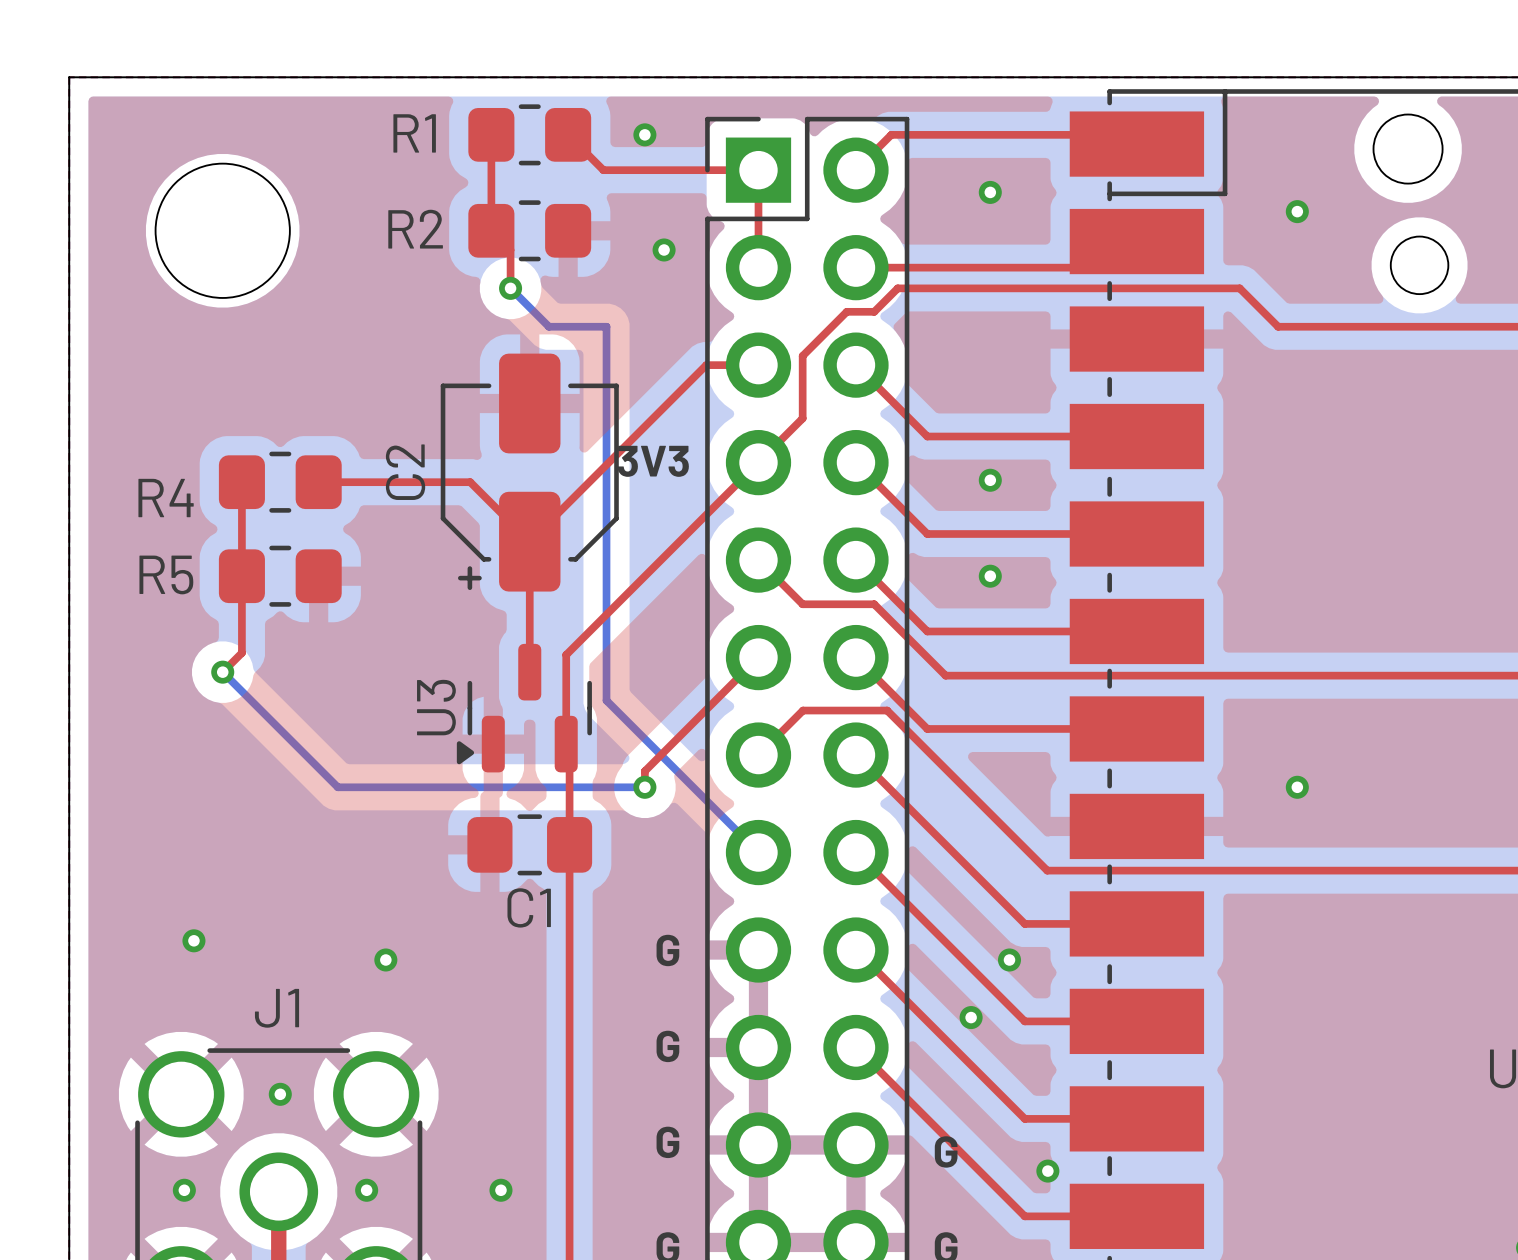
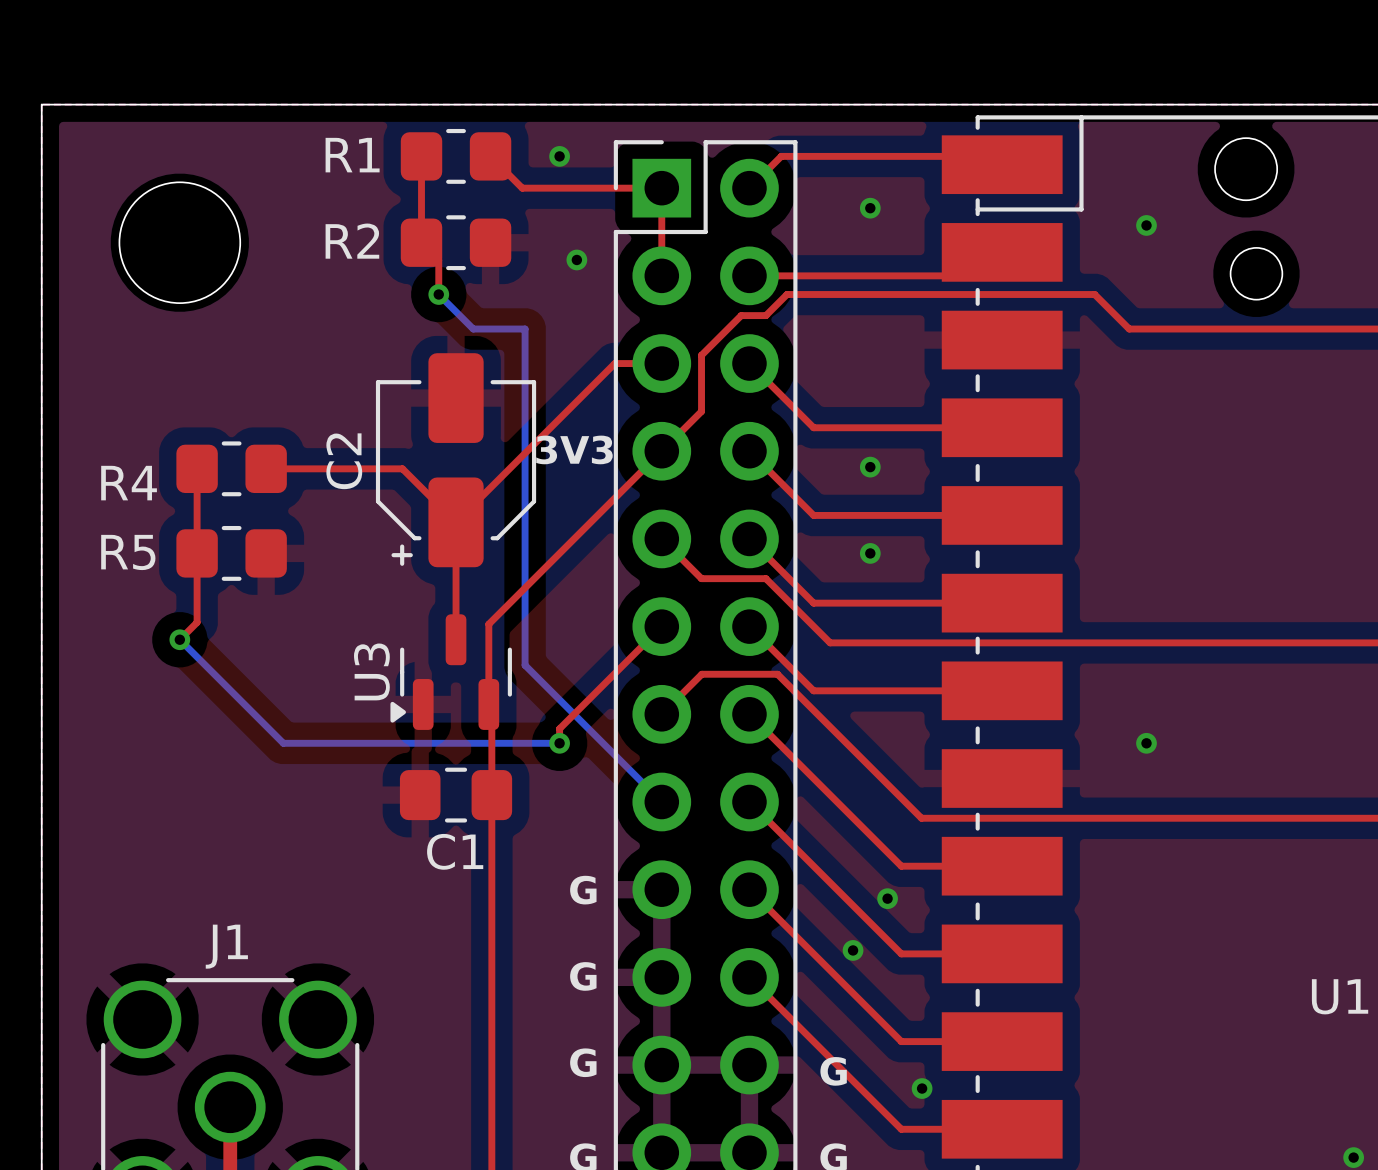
via: (193, 940) -> none
via: (385, 959) -> none
via: (280, 1094) -> none
via: (184, 1190) -> none
via: (366, 1190) -> none
via: (500, 1190) -> none

